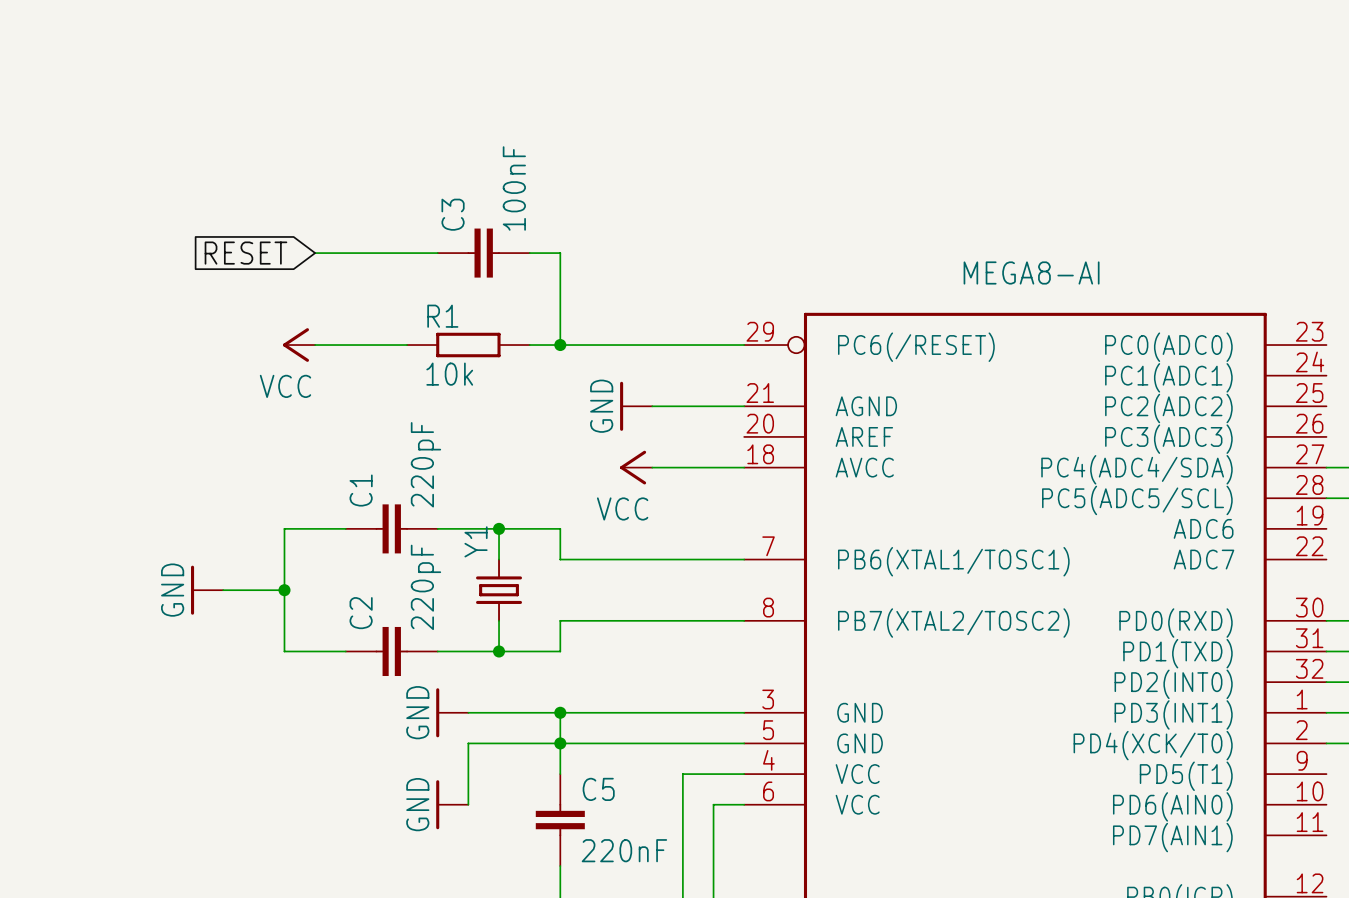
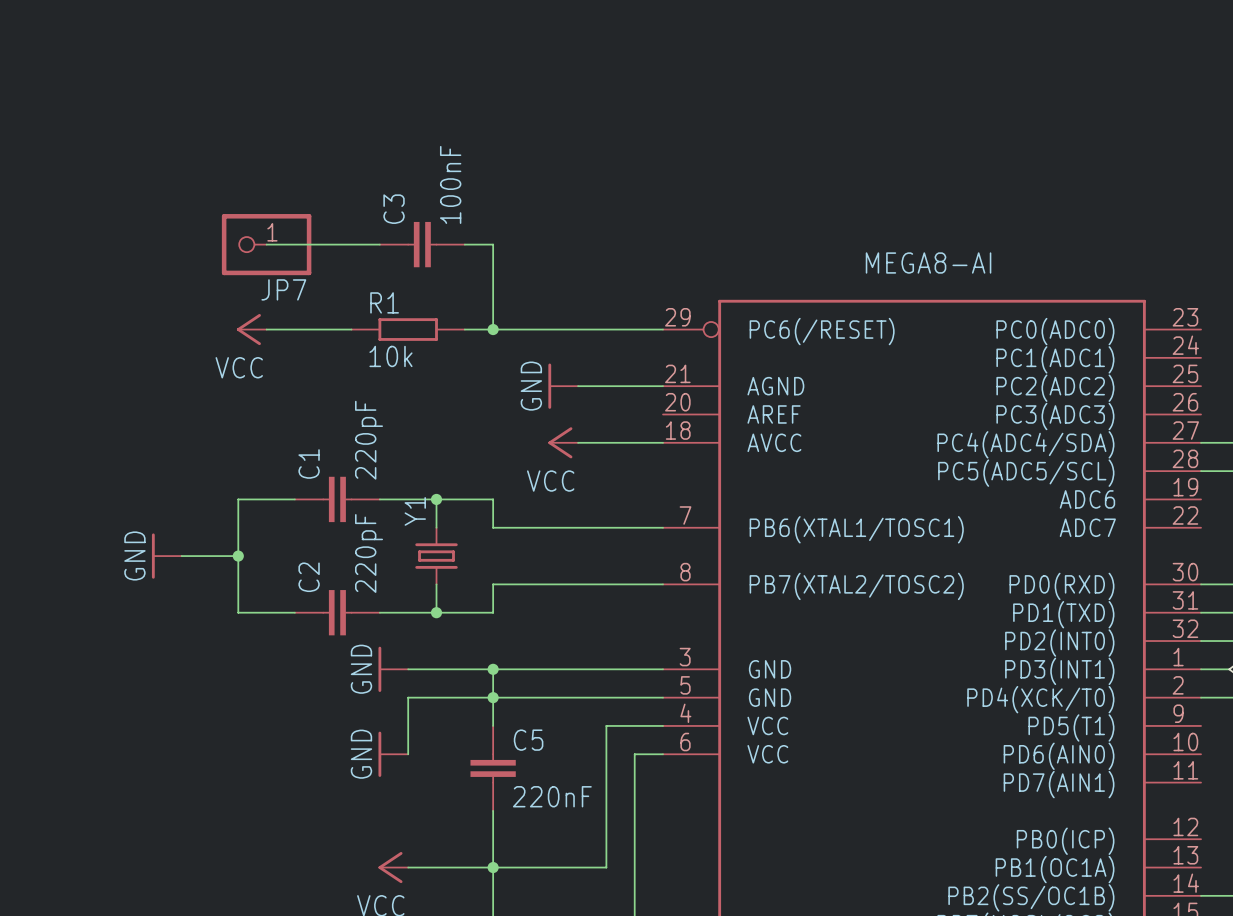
global label: RESET (245, 253) -> none
JP7: none -> (266, 244)

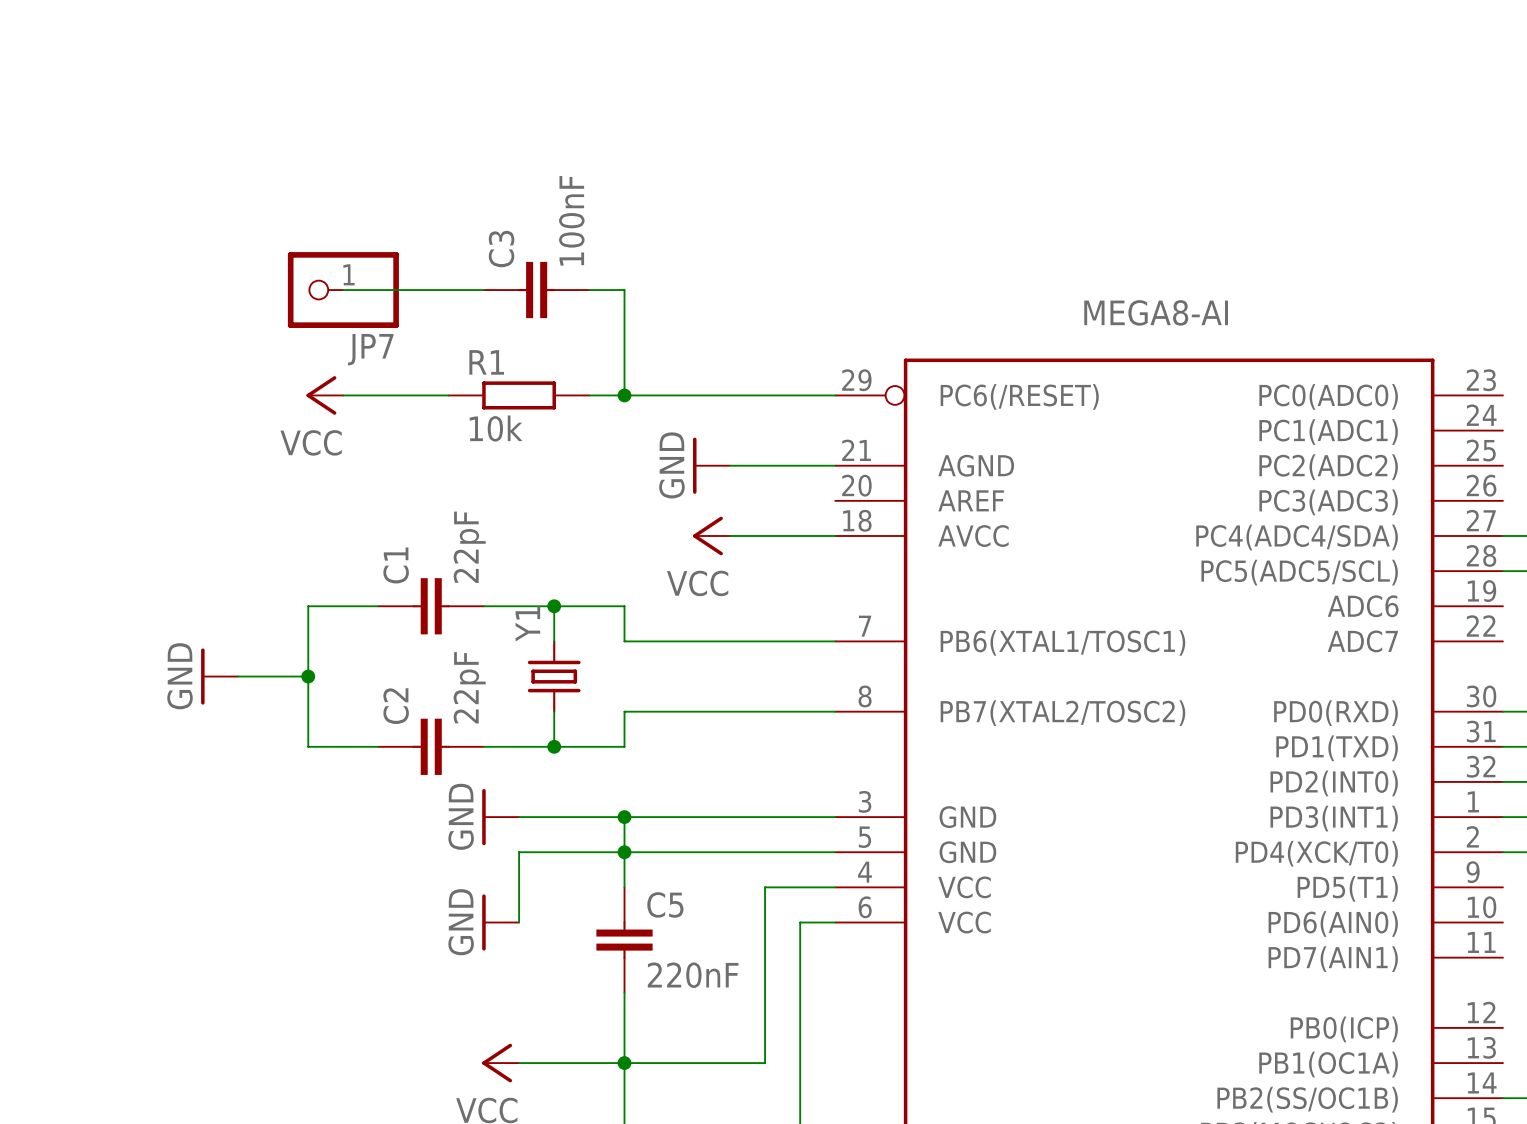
C1 value: 220pF (369, 440) -> 22pF (469, 547)
C2 value: 220pF (369, 553) -> 22pF (469, 687)

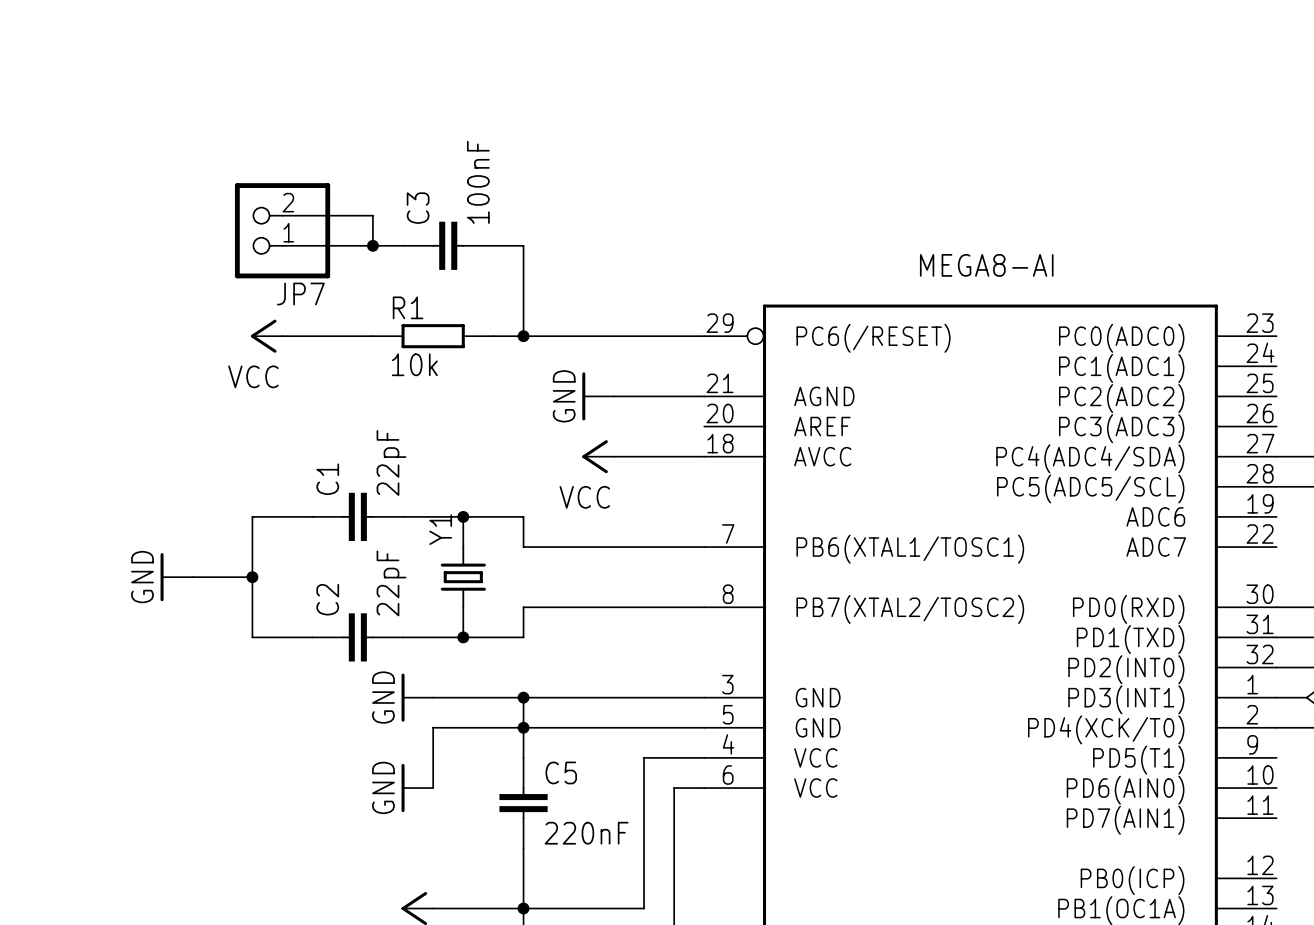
JP7 symbol: [287, 252, 399, 328] -> [234, 183, 331, 279]
wire: none -> (282, 215) (372, 215) (372, 245)
junction: none -> (372, 245)

